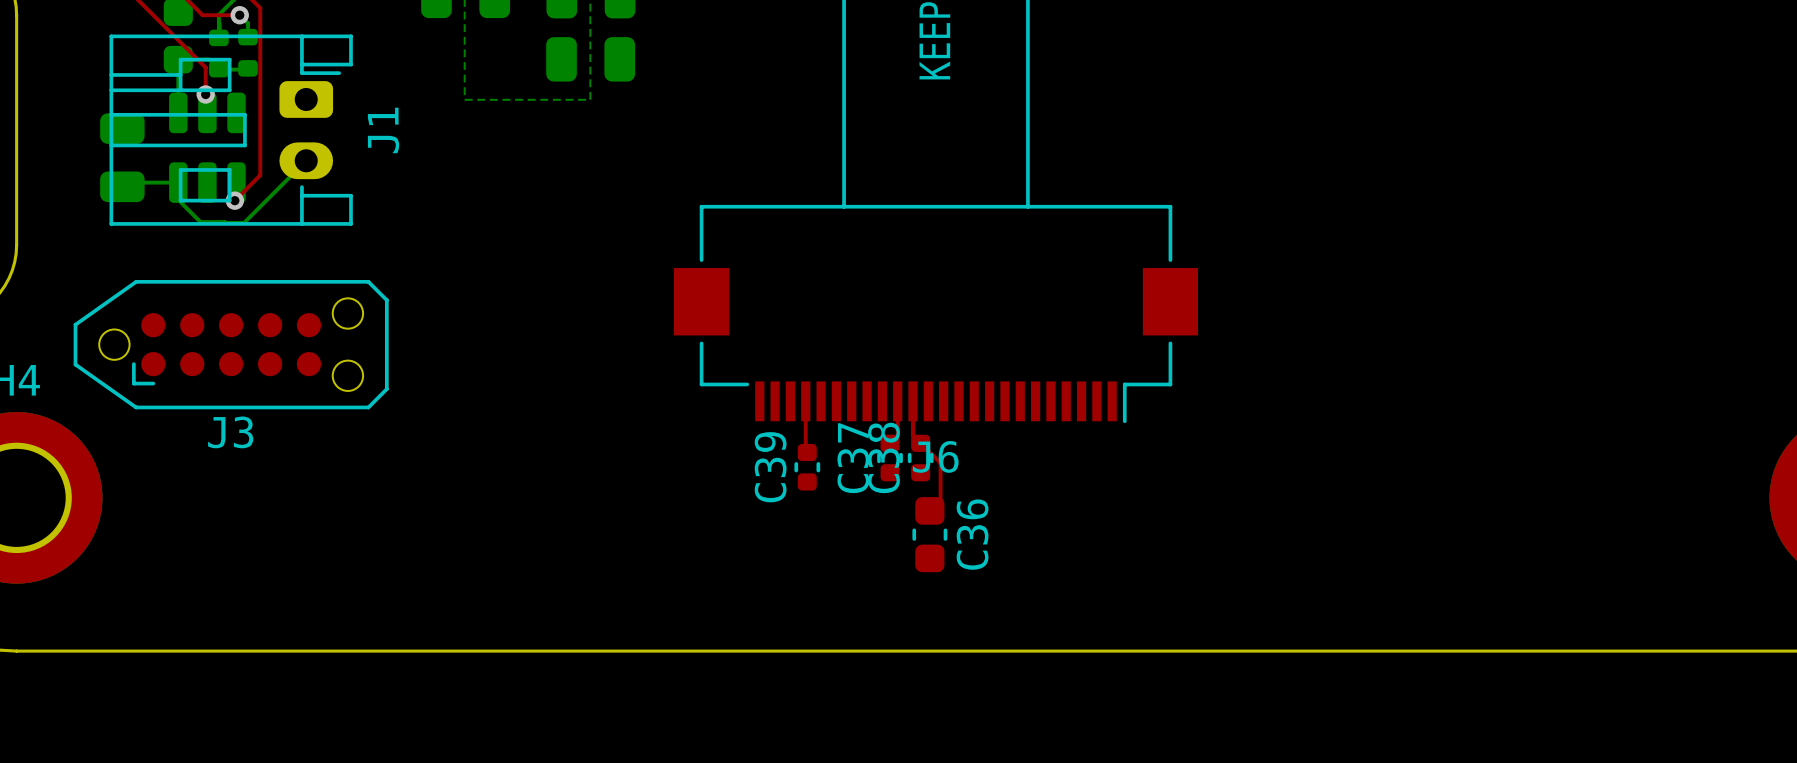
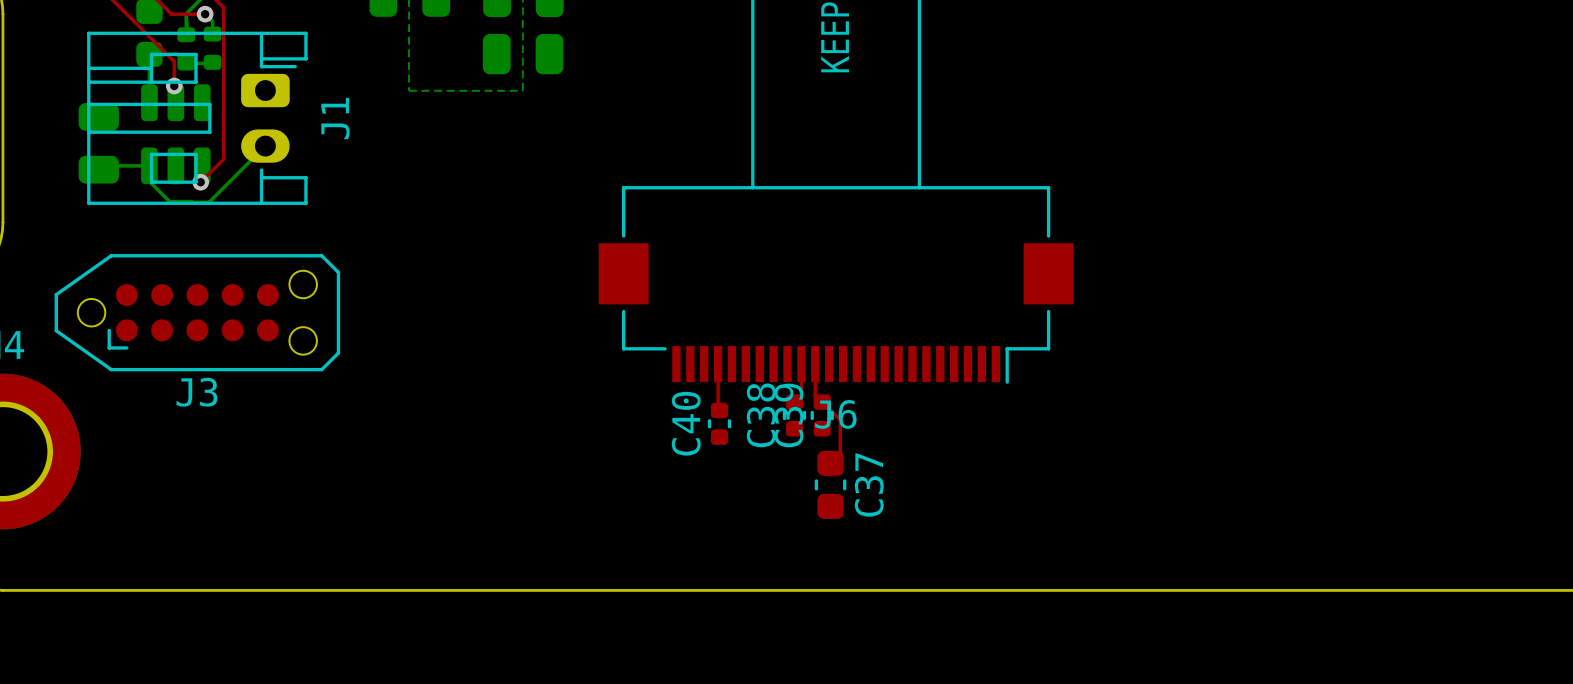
C38 name: C38 (884, 457) -> C39 (789, 415)
C37 name: C37 (853, 458) -> C38 (761, 415)
C39 name: C39 (770, 467) -> C40 (686, 423)
C36 name: C36 (972, 534) -> C37 (869, 485)

